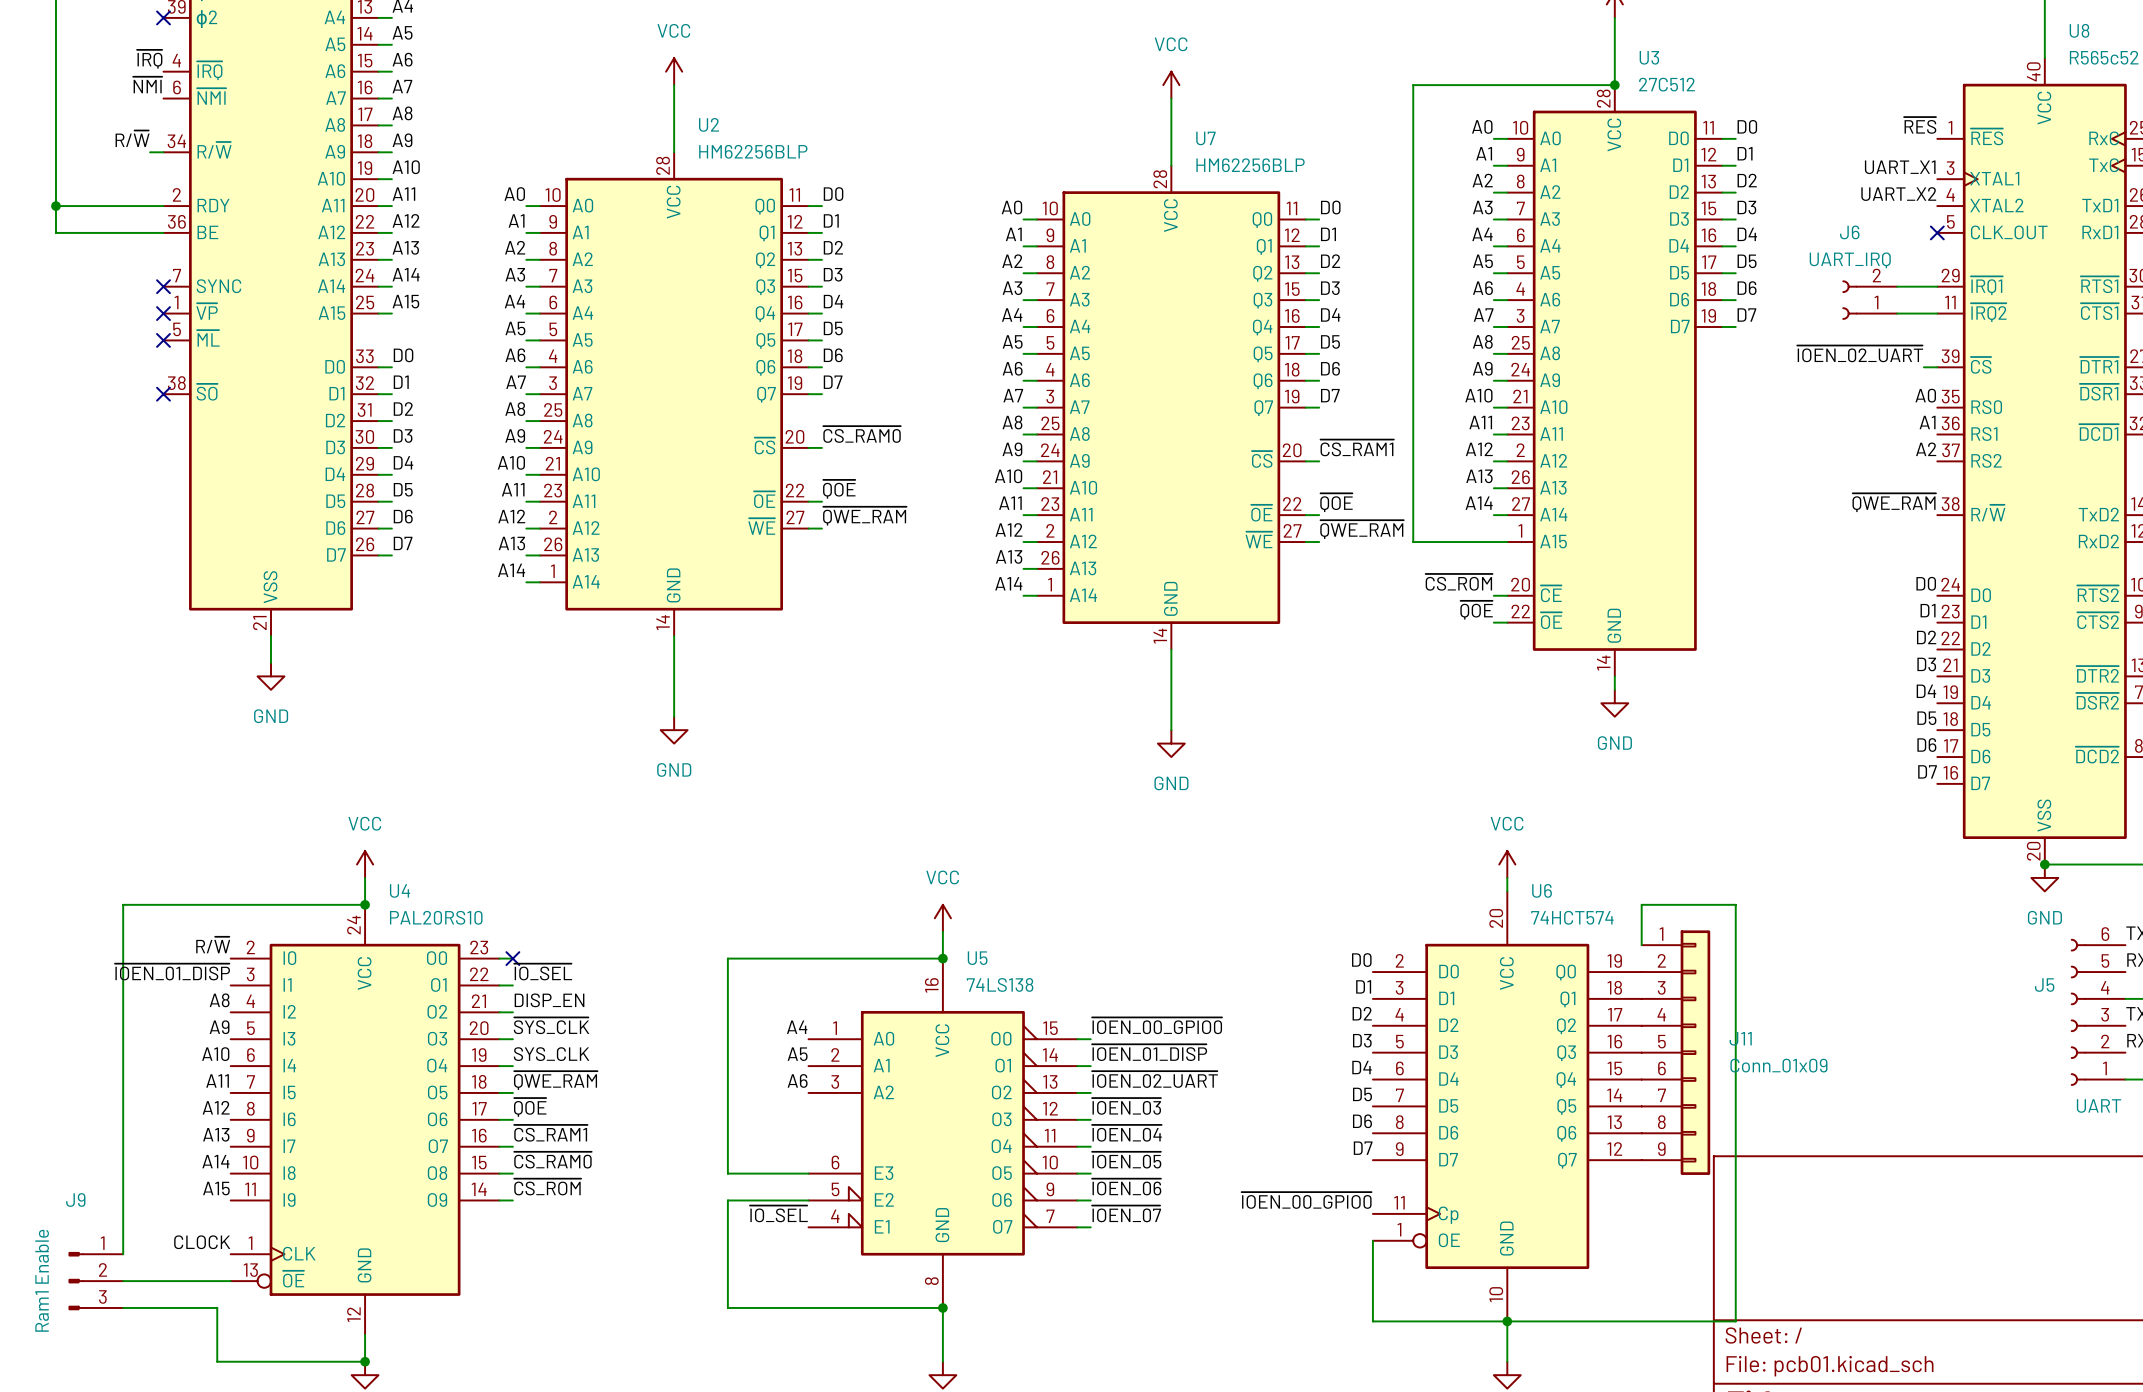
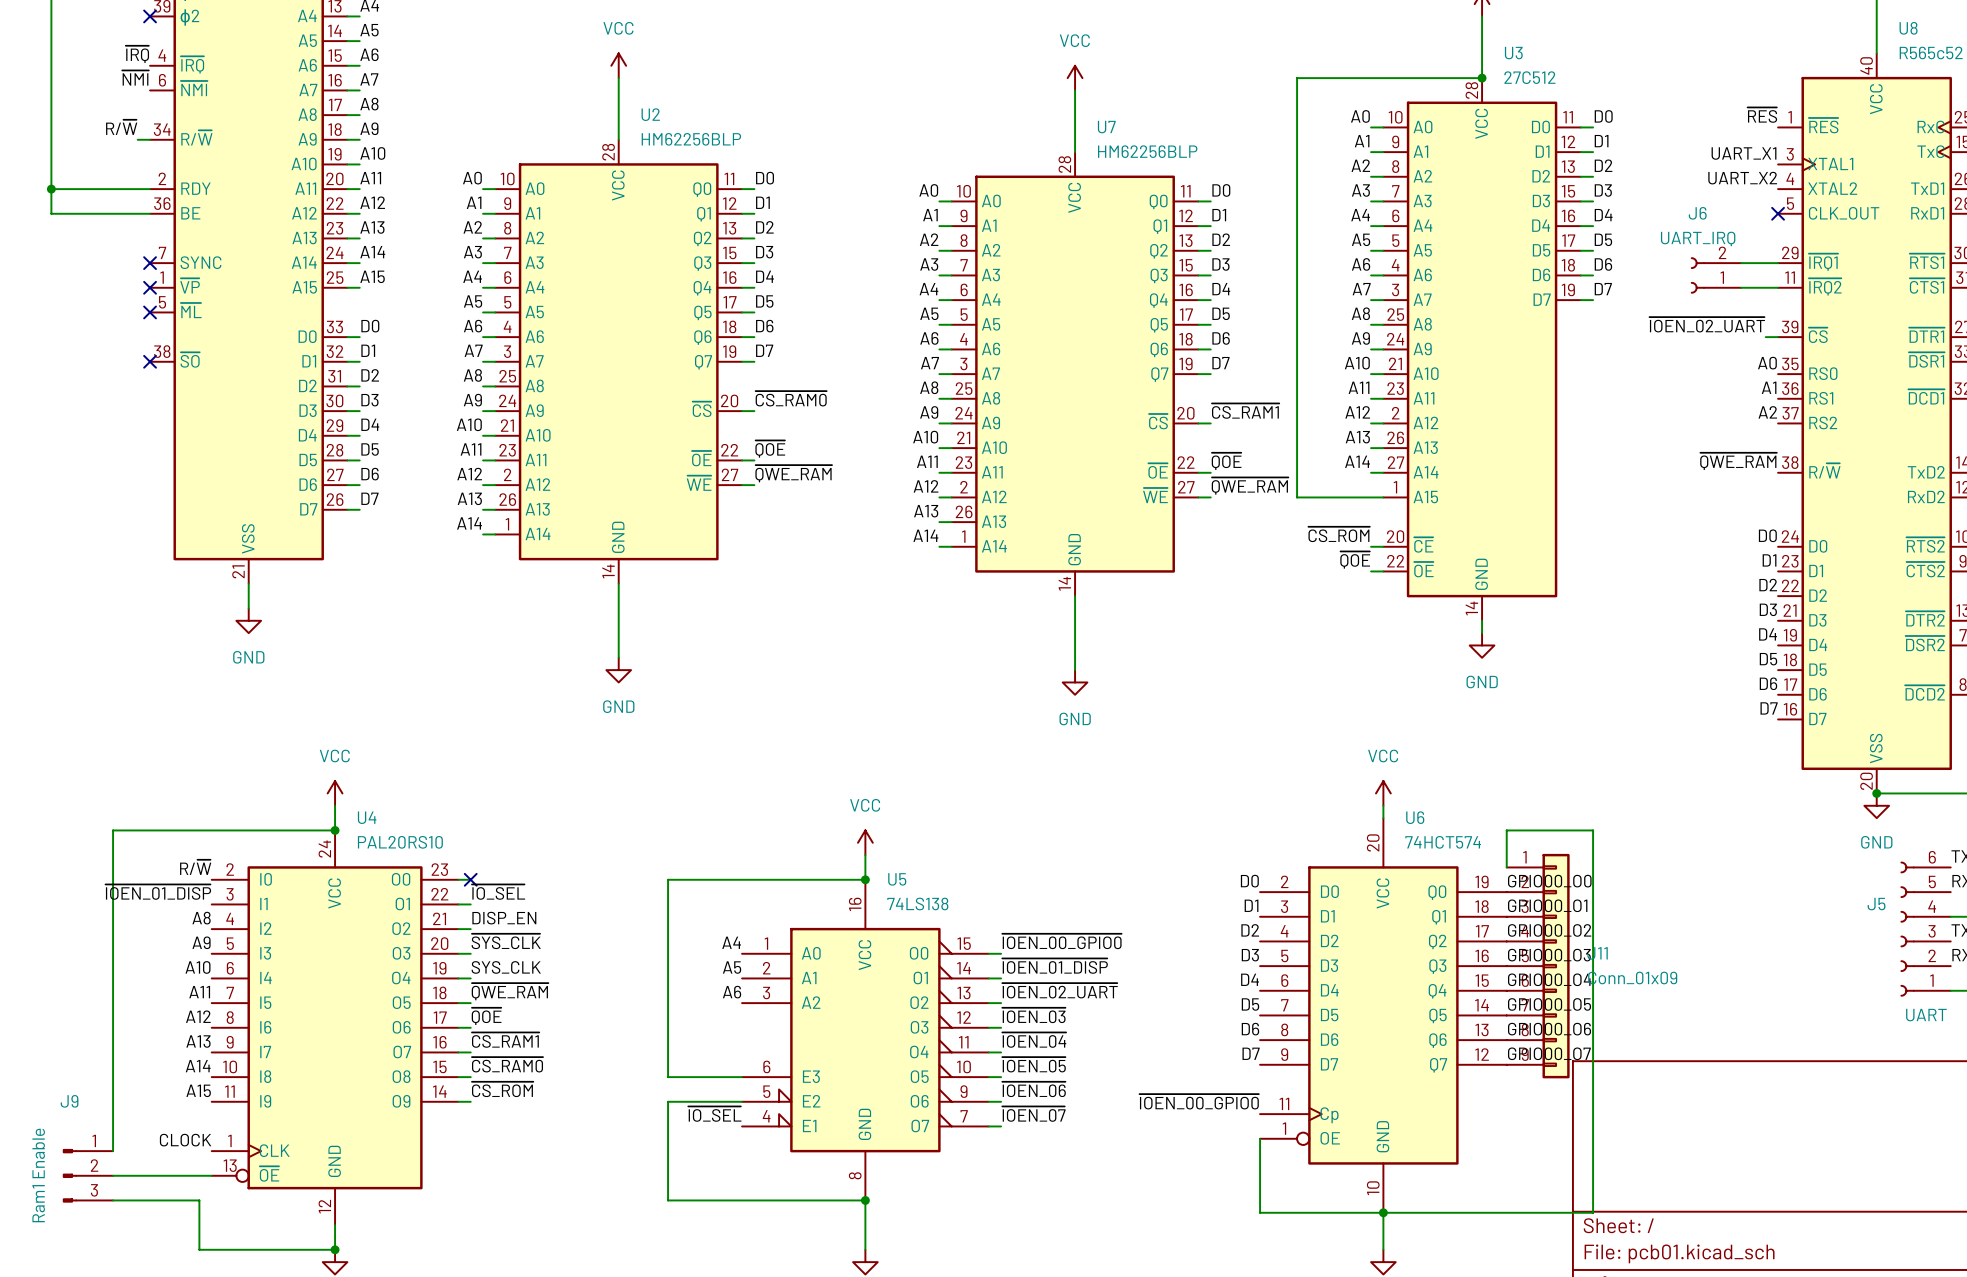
label: none -> GPIO00_O0 (1549, 881)
label: none -> GPIO00_O1 (1547, 905)
label: none -> GPIO00_O2 (1549, 930)
label: none -> GPIO00_O3 (1549, 955)
label: none -> GPIO00_O4 (1549, 979)
label: none -> GPIO00_O5 (1549, 1004)
label: none -> GPIO00_O6 (1549, 1029)
label: none -> GPIO00_O7 (1549, 1053)

